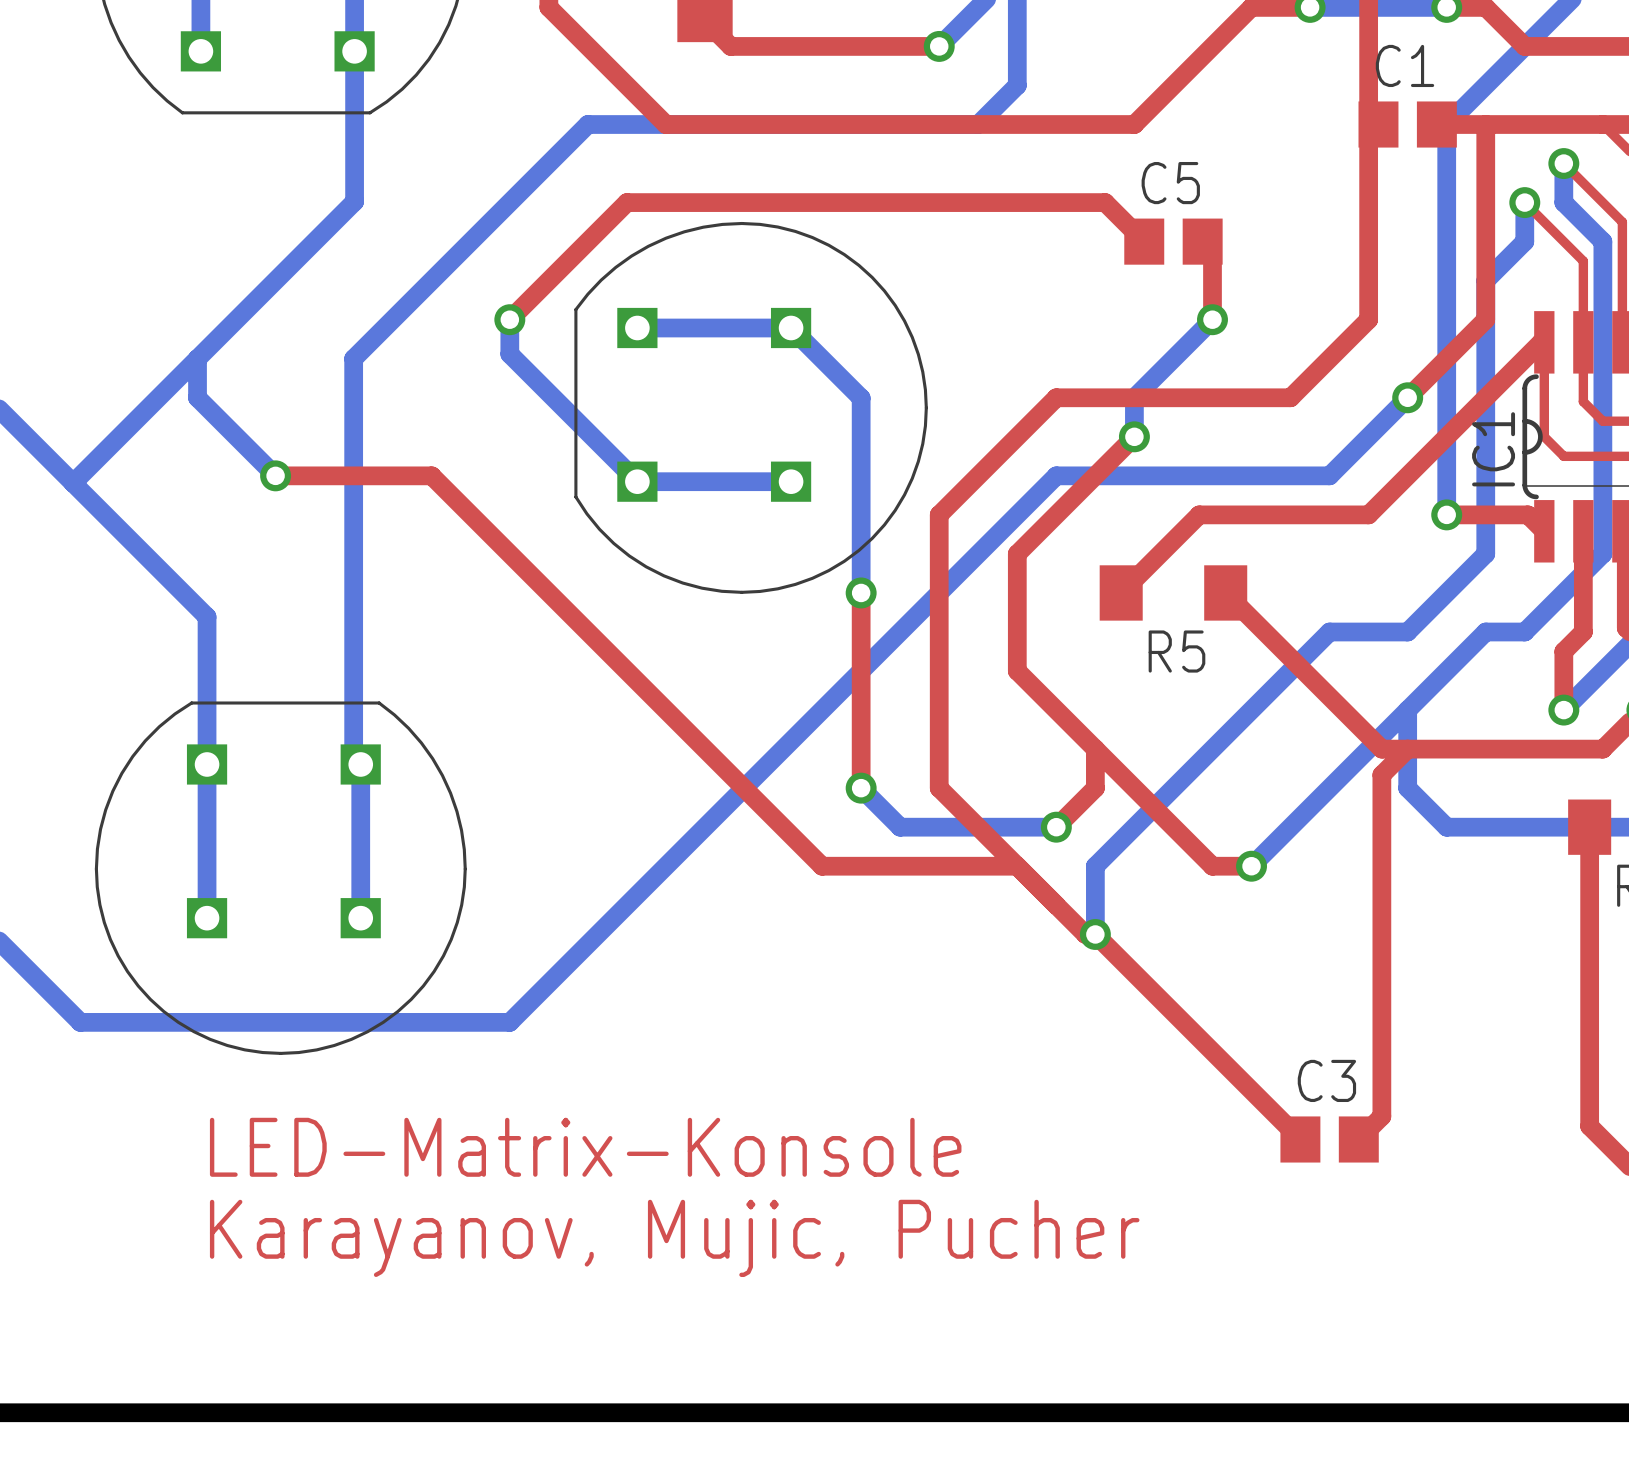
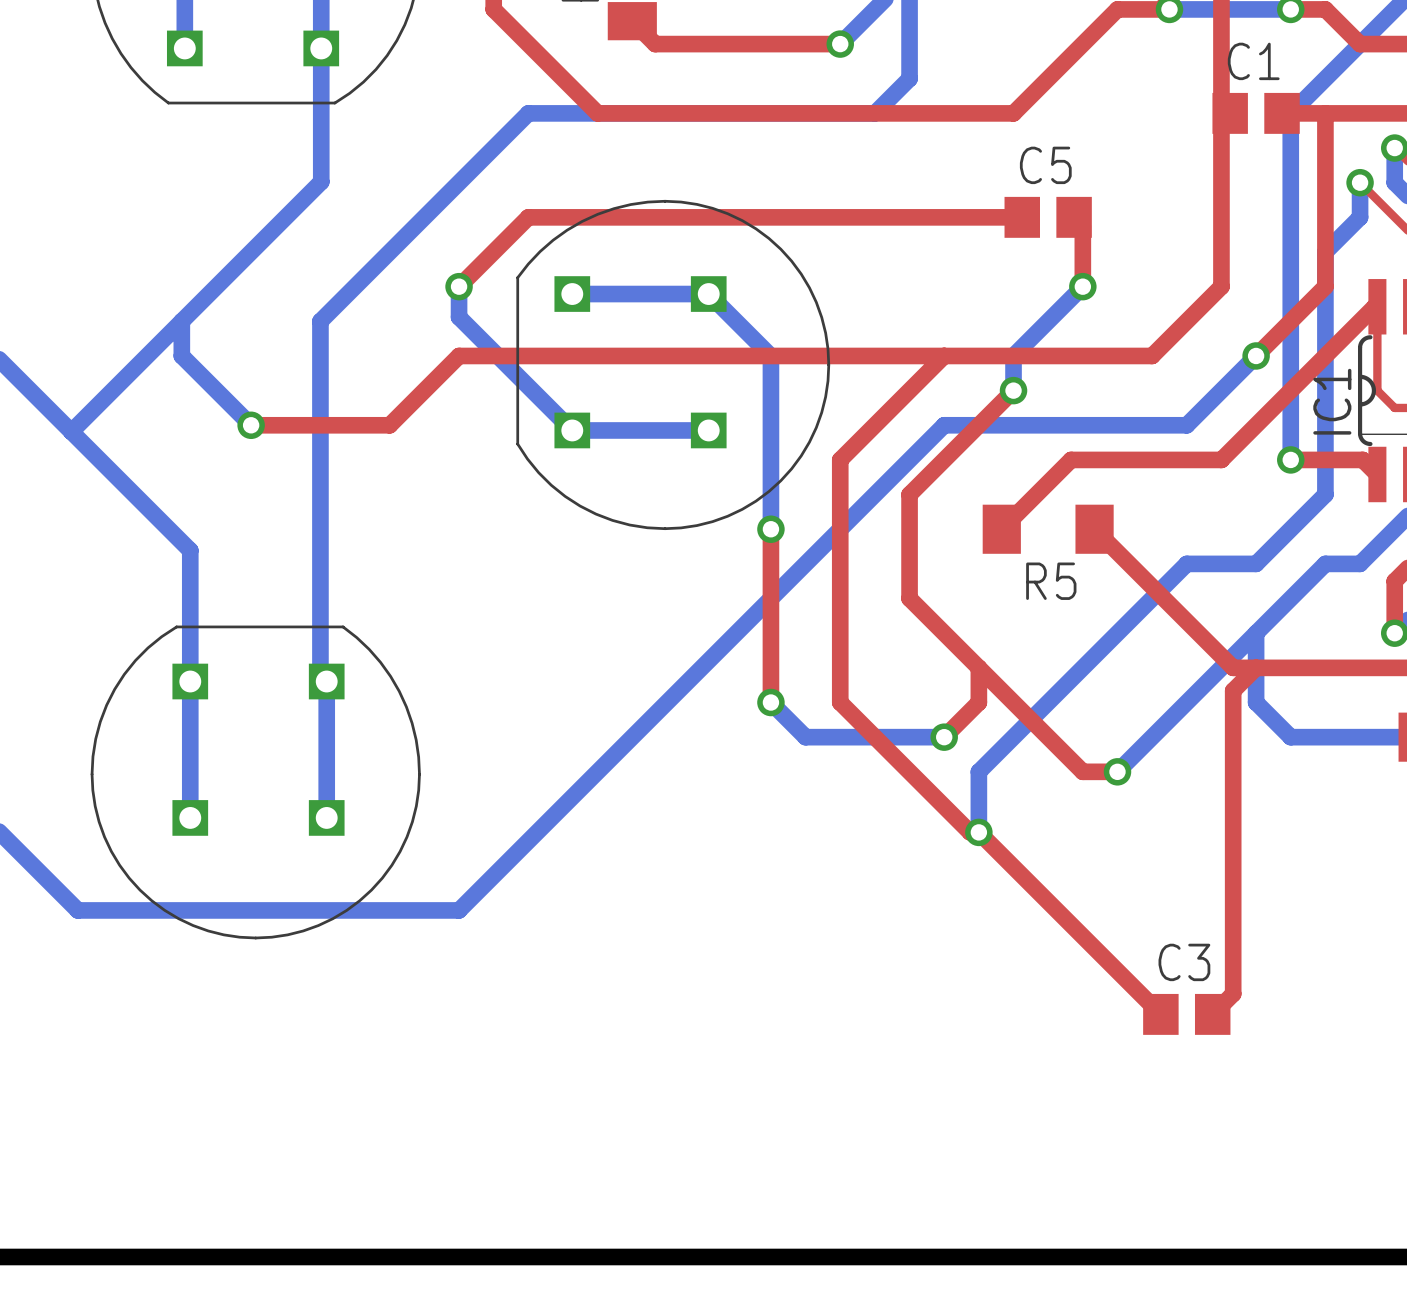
top track: (587, 241) (626, 202) (1105, 202) (1144, 241) -> (528, 217) (1022, 217)
top track: (431, 475) (822, 866) (1017, 866) -> (389, 425) (459, 355) (944, 355)
text: LED-Matrix-Konsole (585, 1147) -> none
text: Karayanov, Mujic, Pucher (674, 1238) -> none

